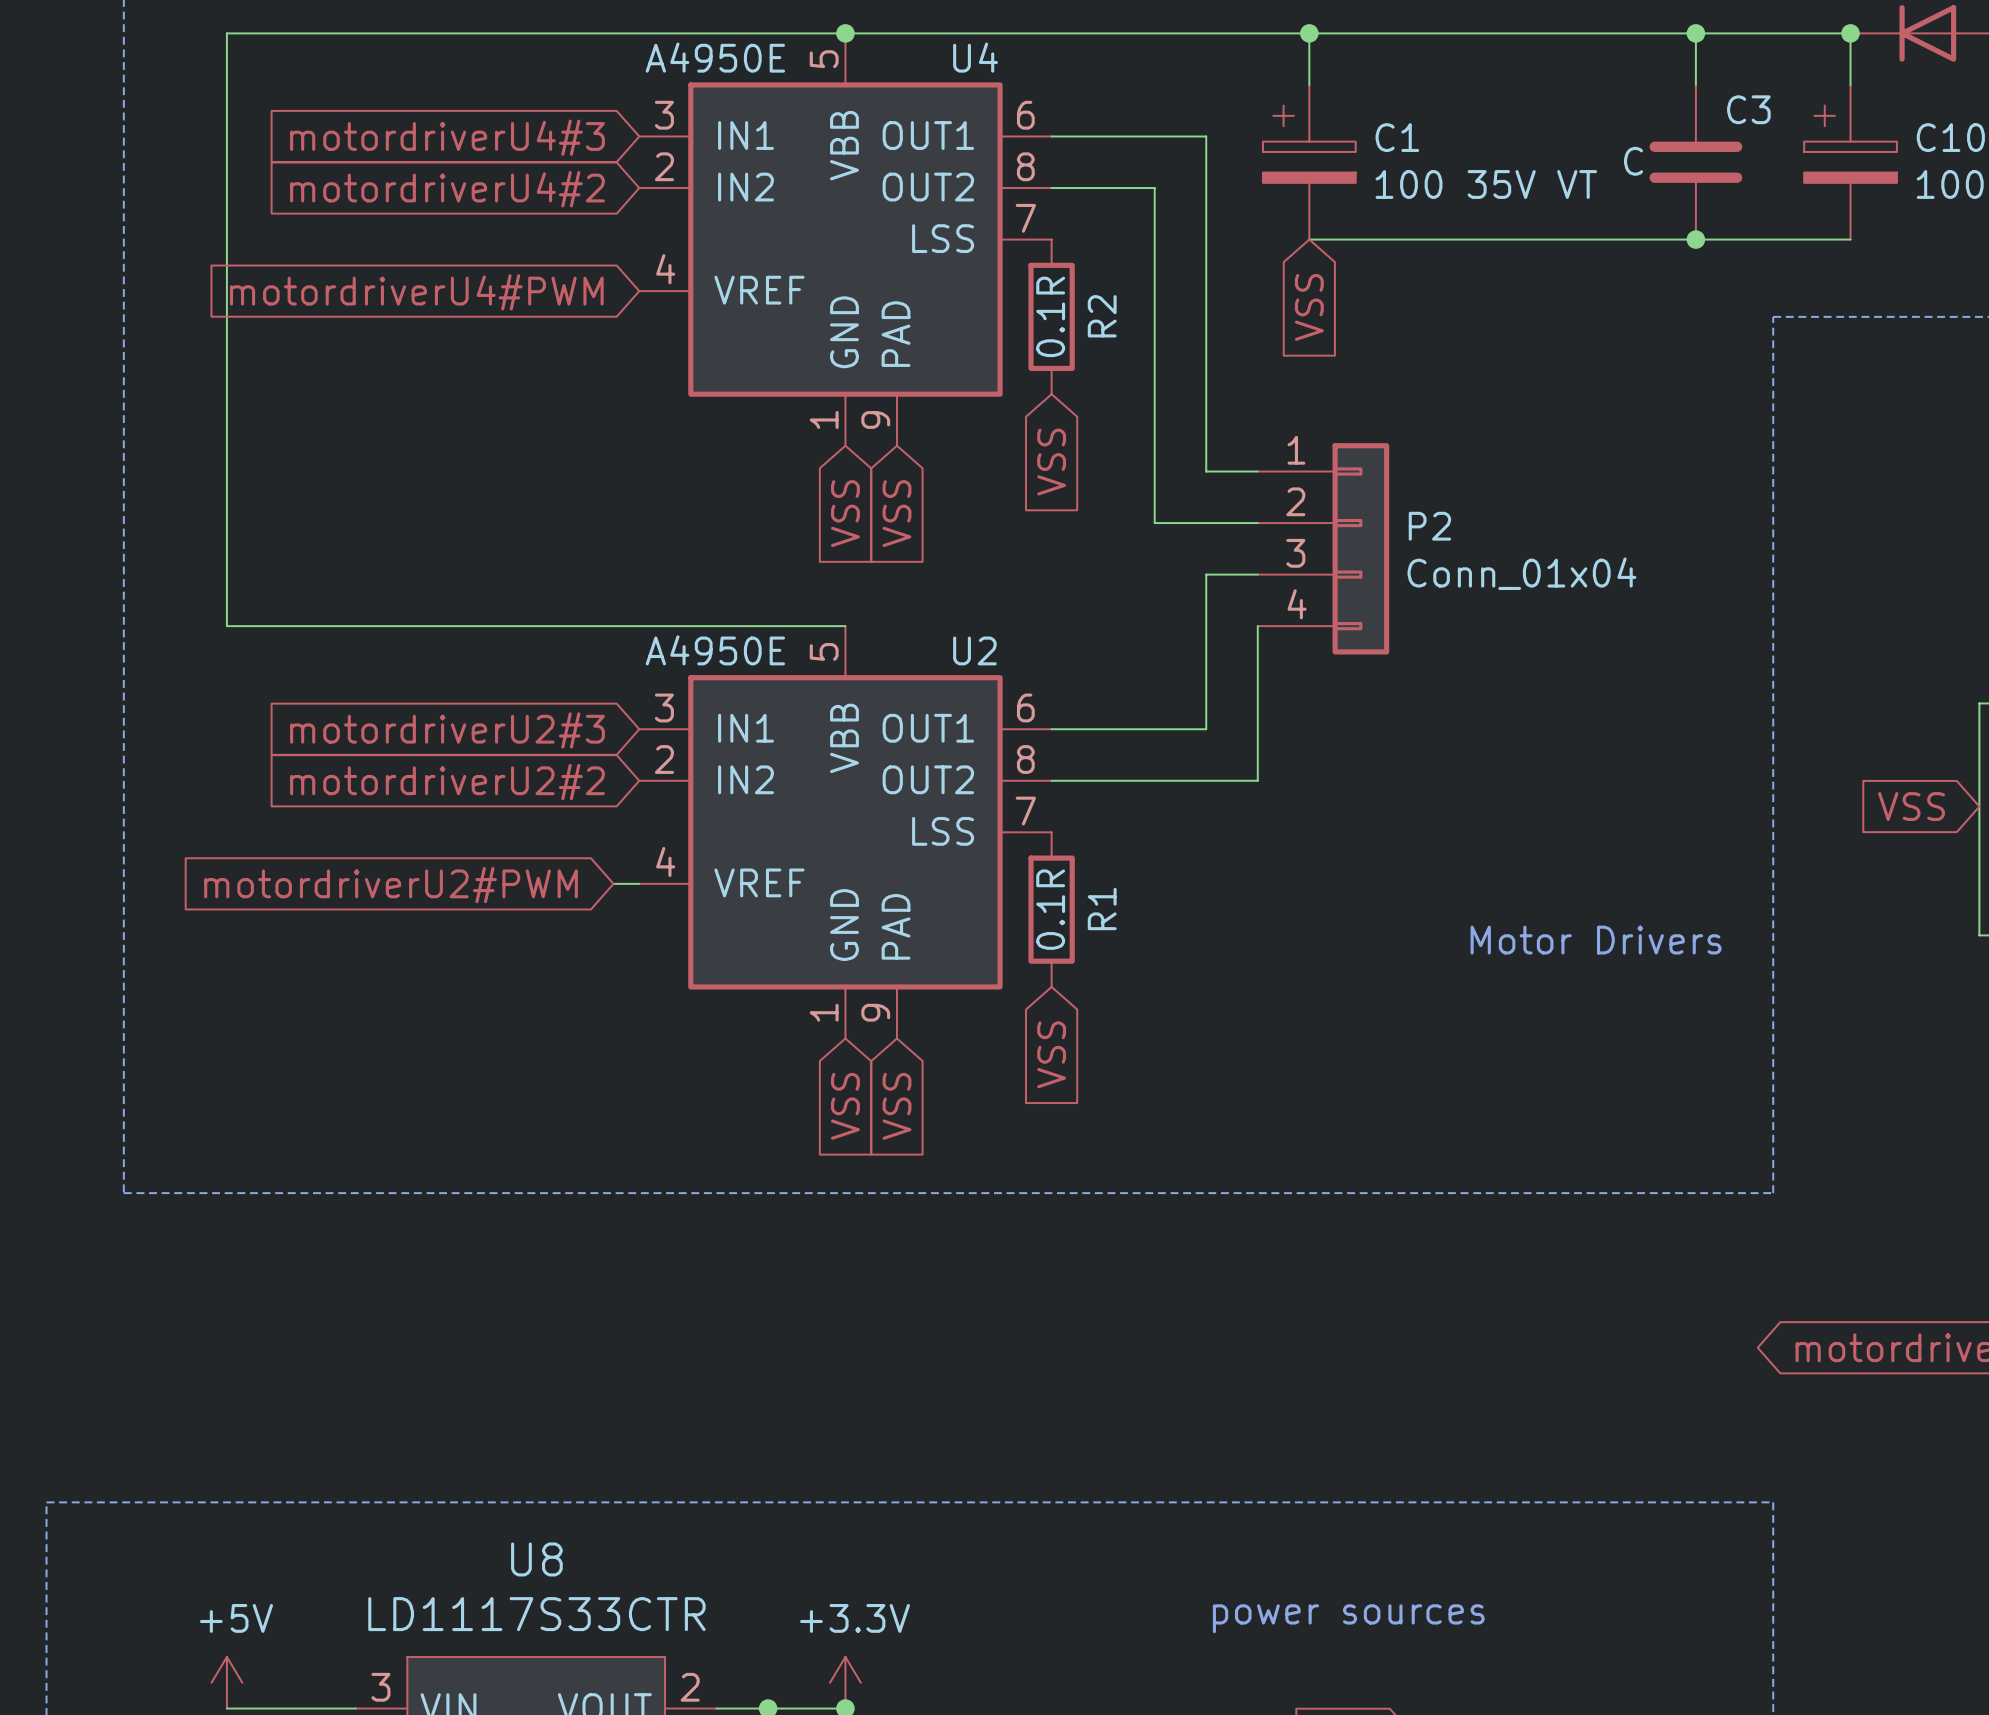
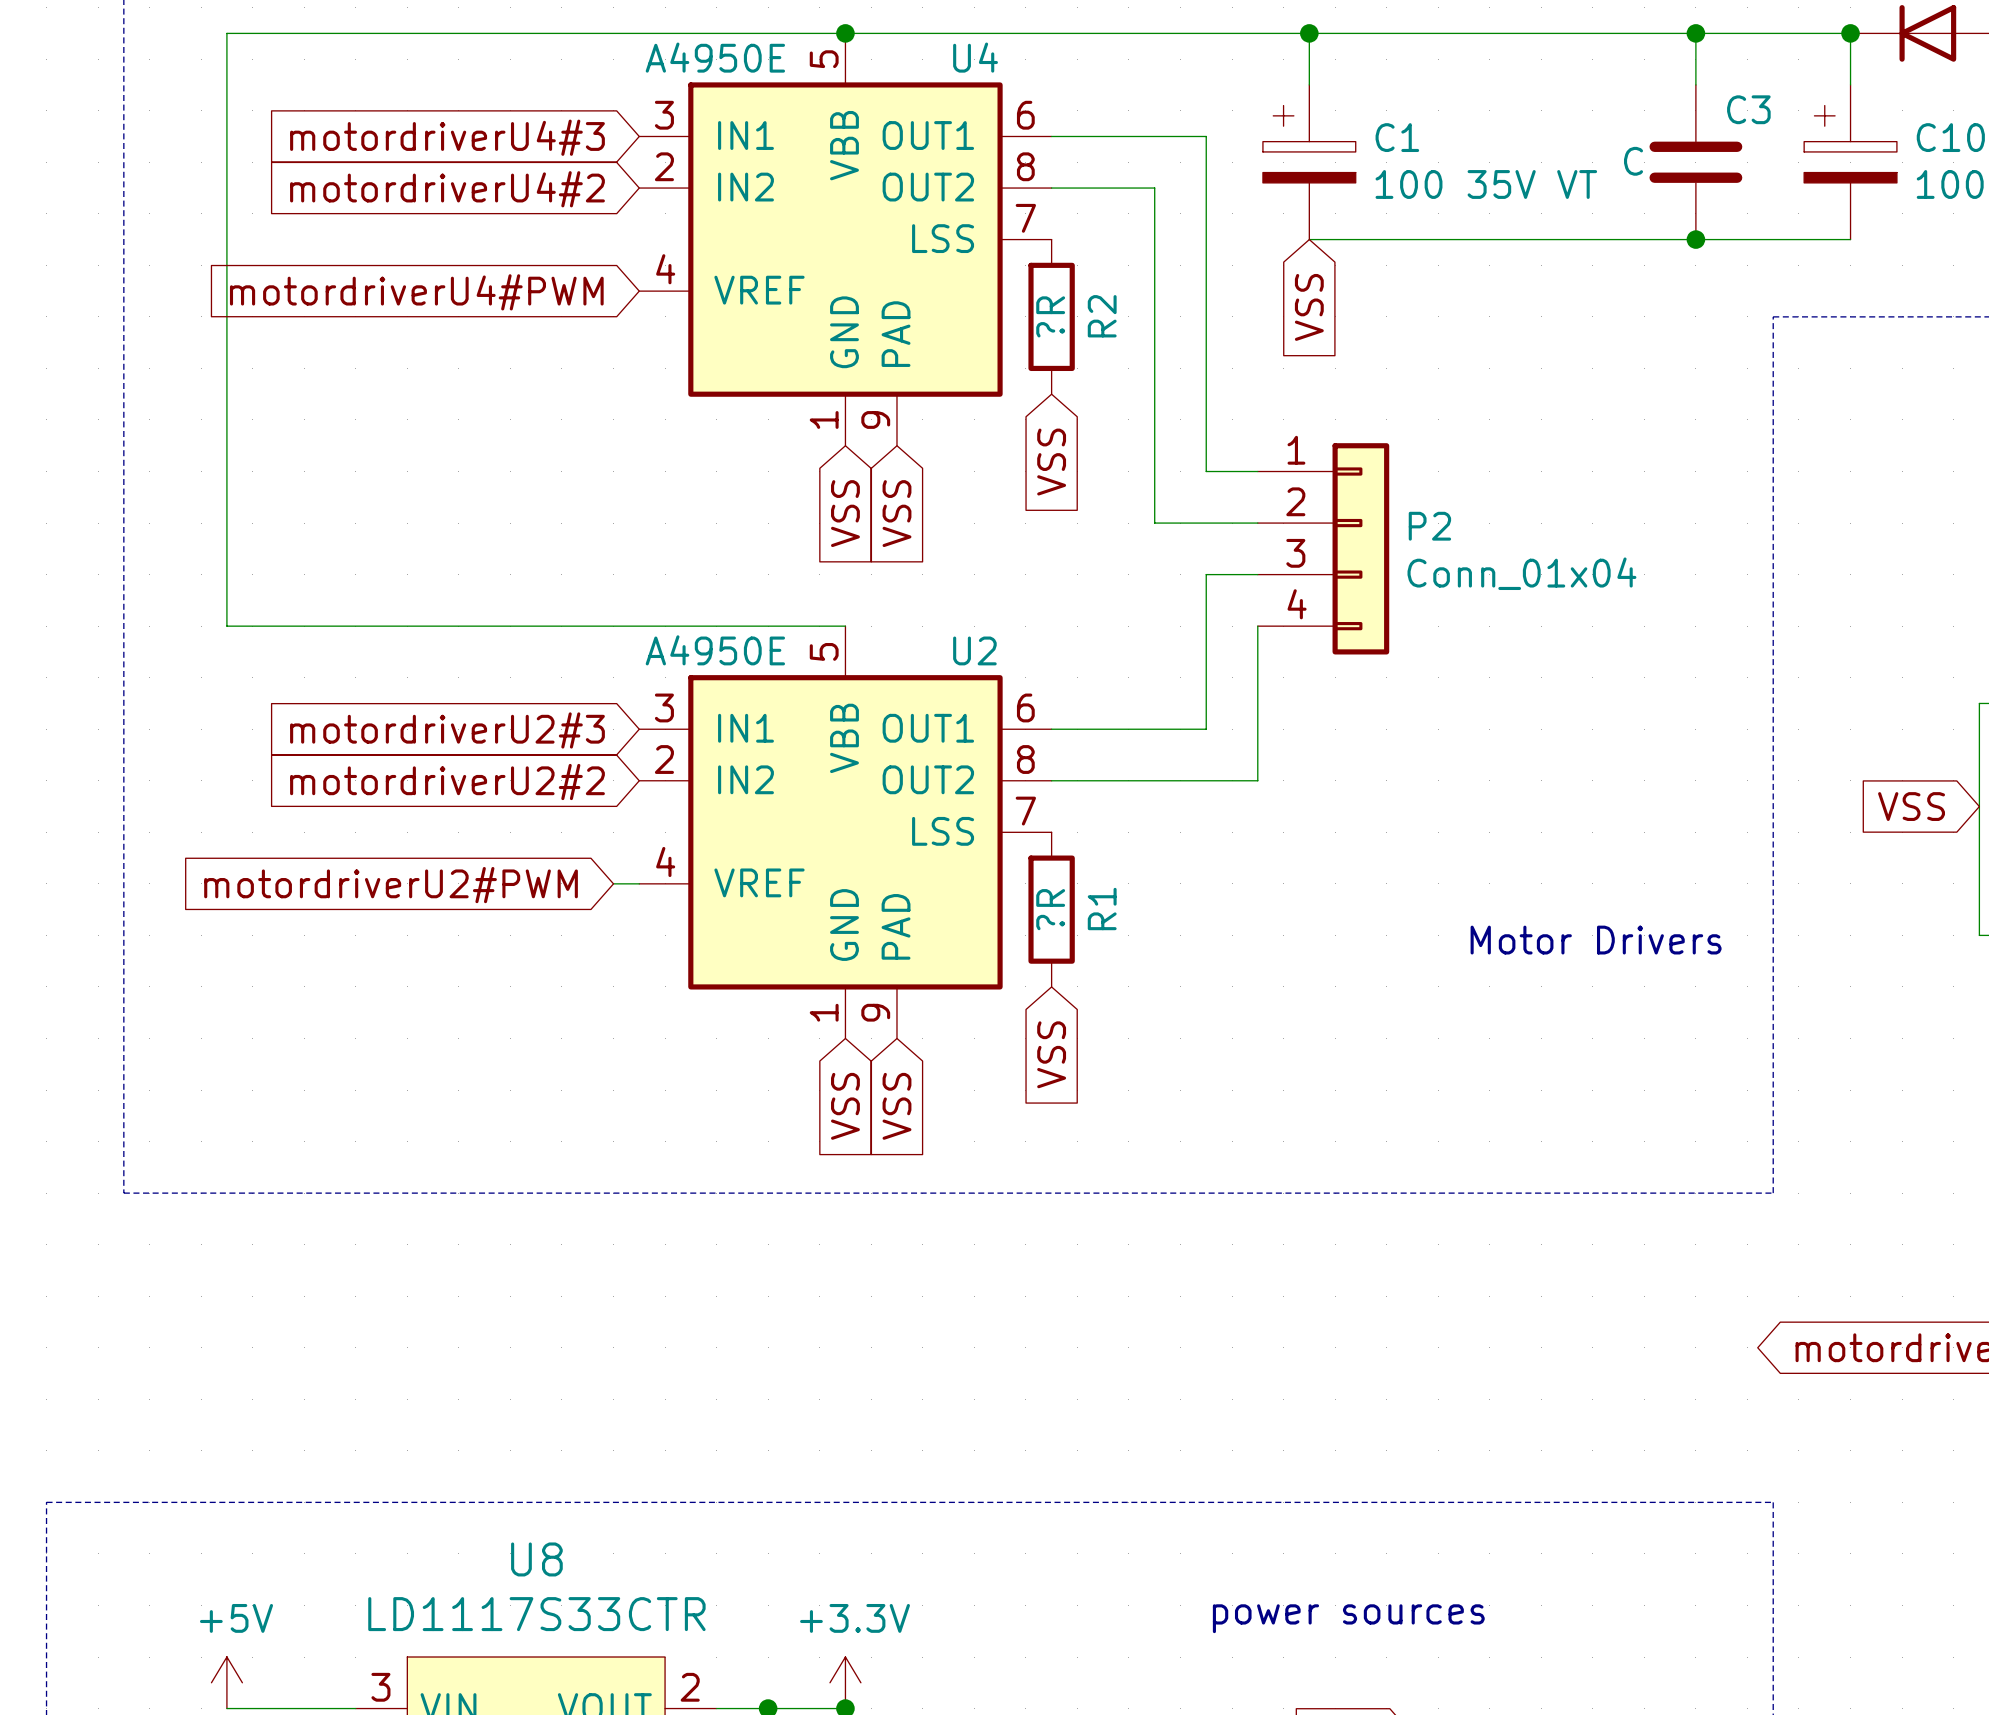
R2 value: 0.1R (1050, 316) -> ?R (1050, 316)
R1 value: 0.1R (1050, 909) -> ?R (1050, 909)

